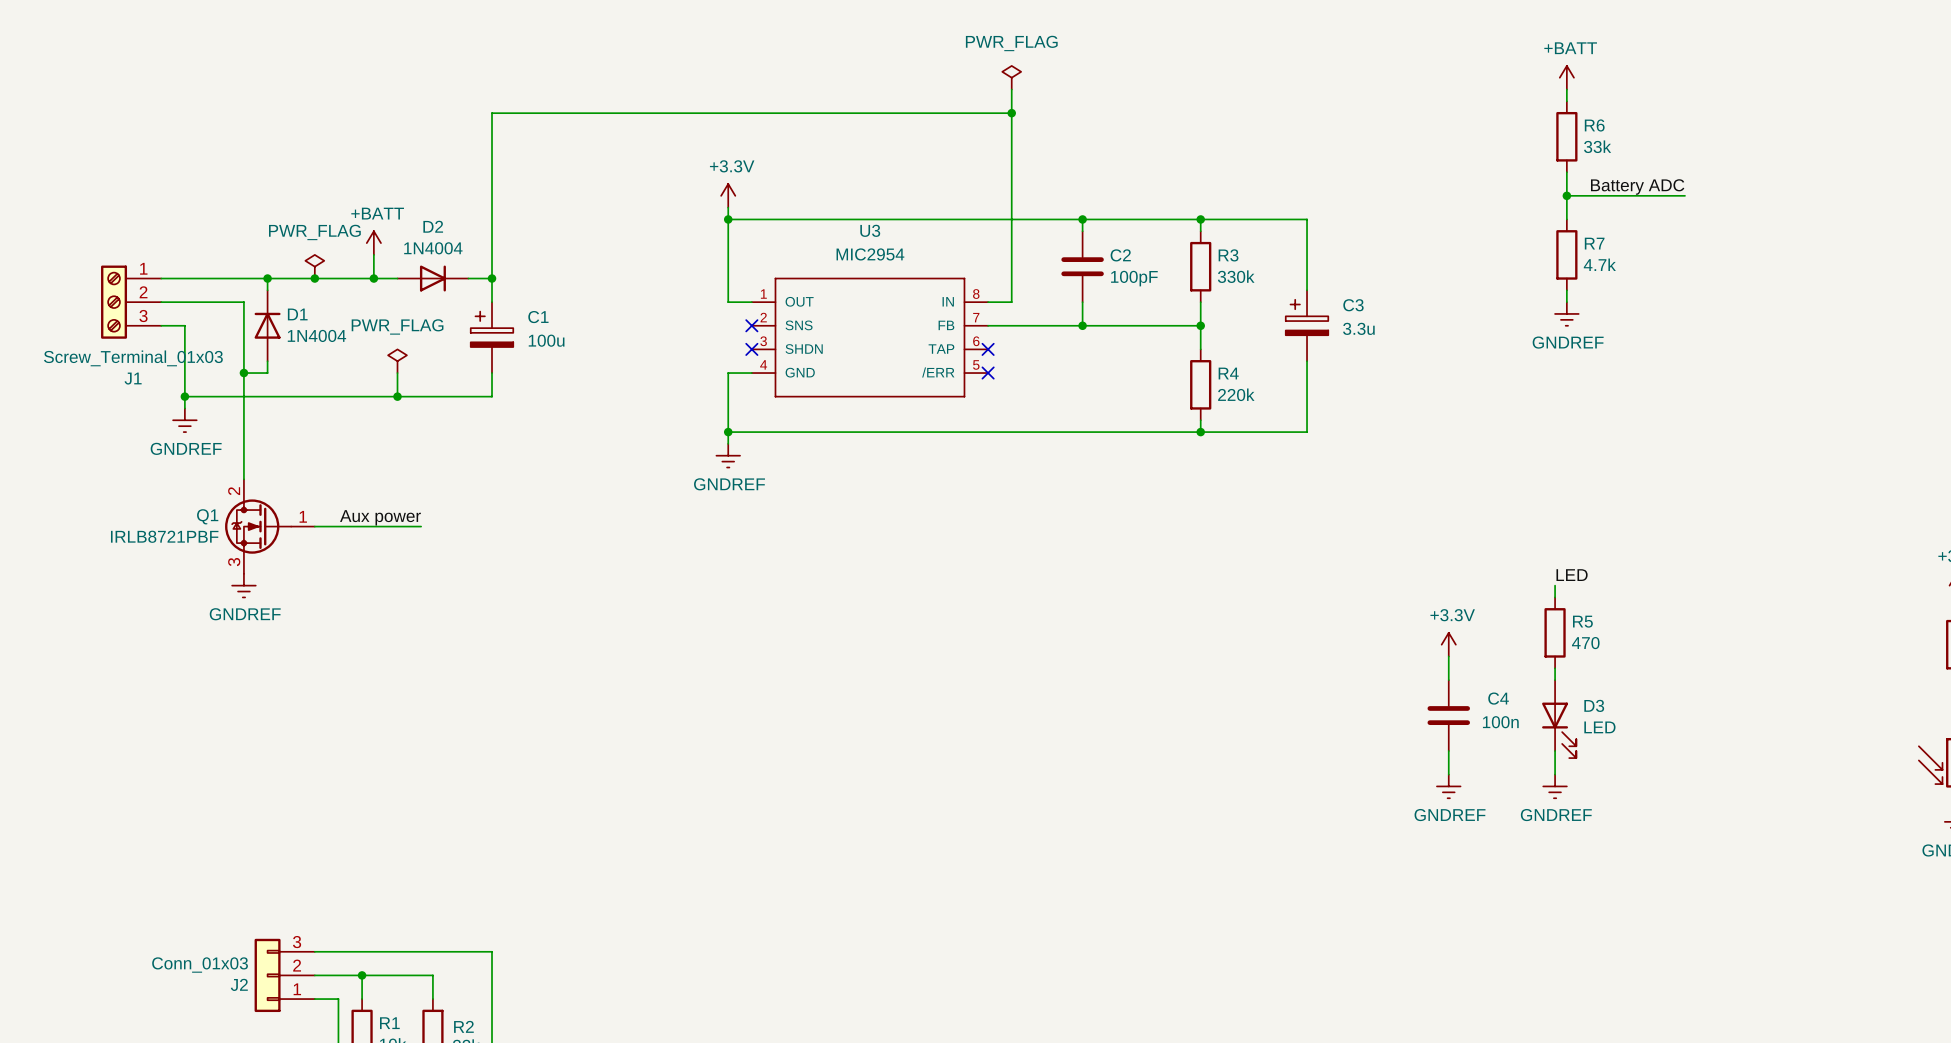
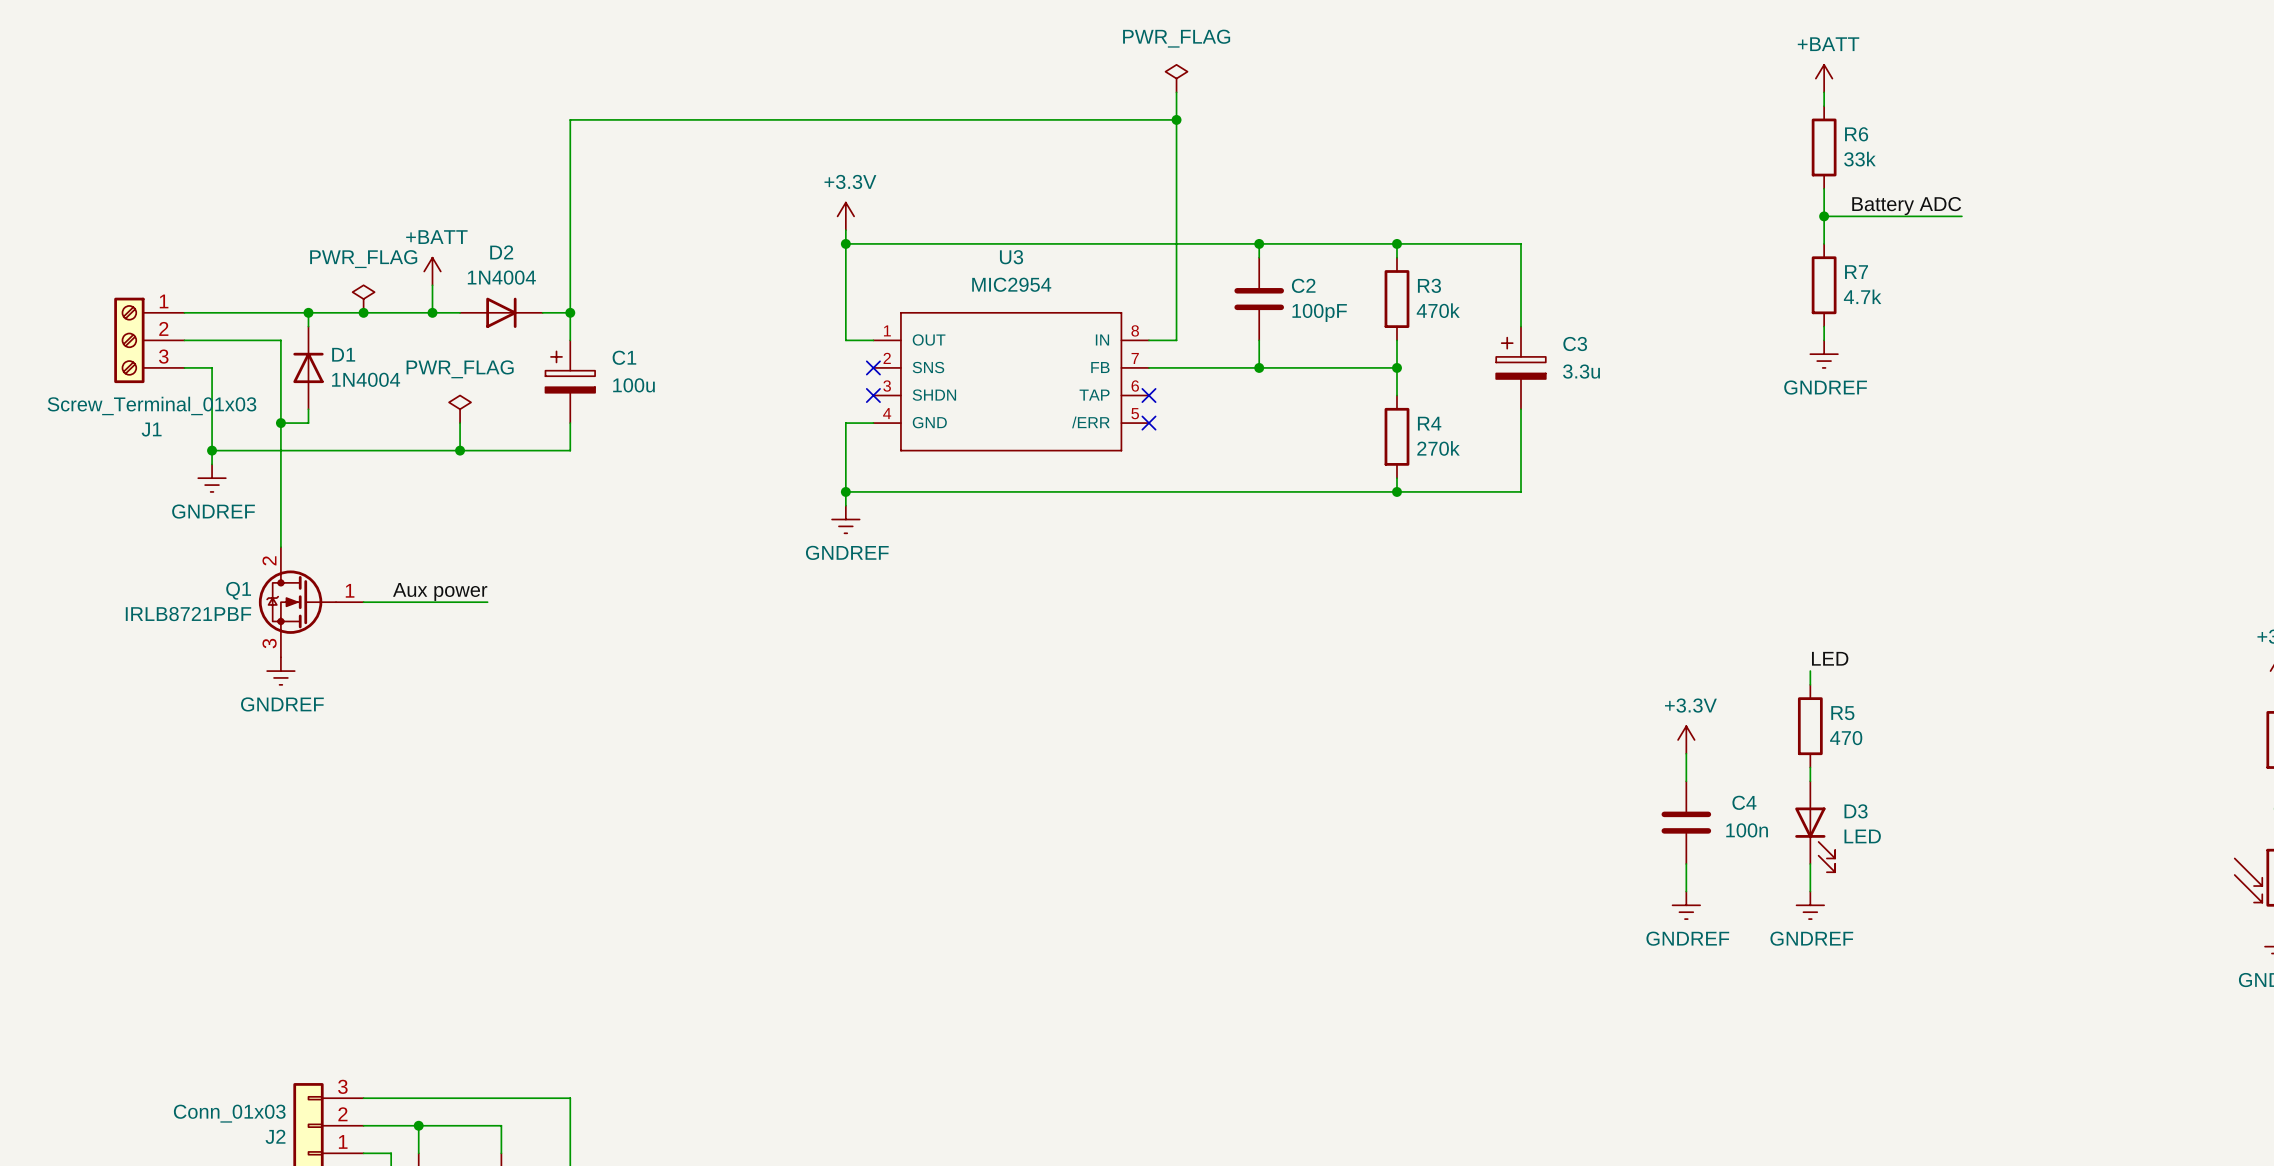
R3 value: 330k (1236, 276) -> 470k (1438, 310)
R4 value: 220k (1236, 394) -> 270k (1438, 448)

